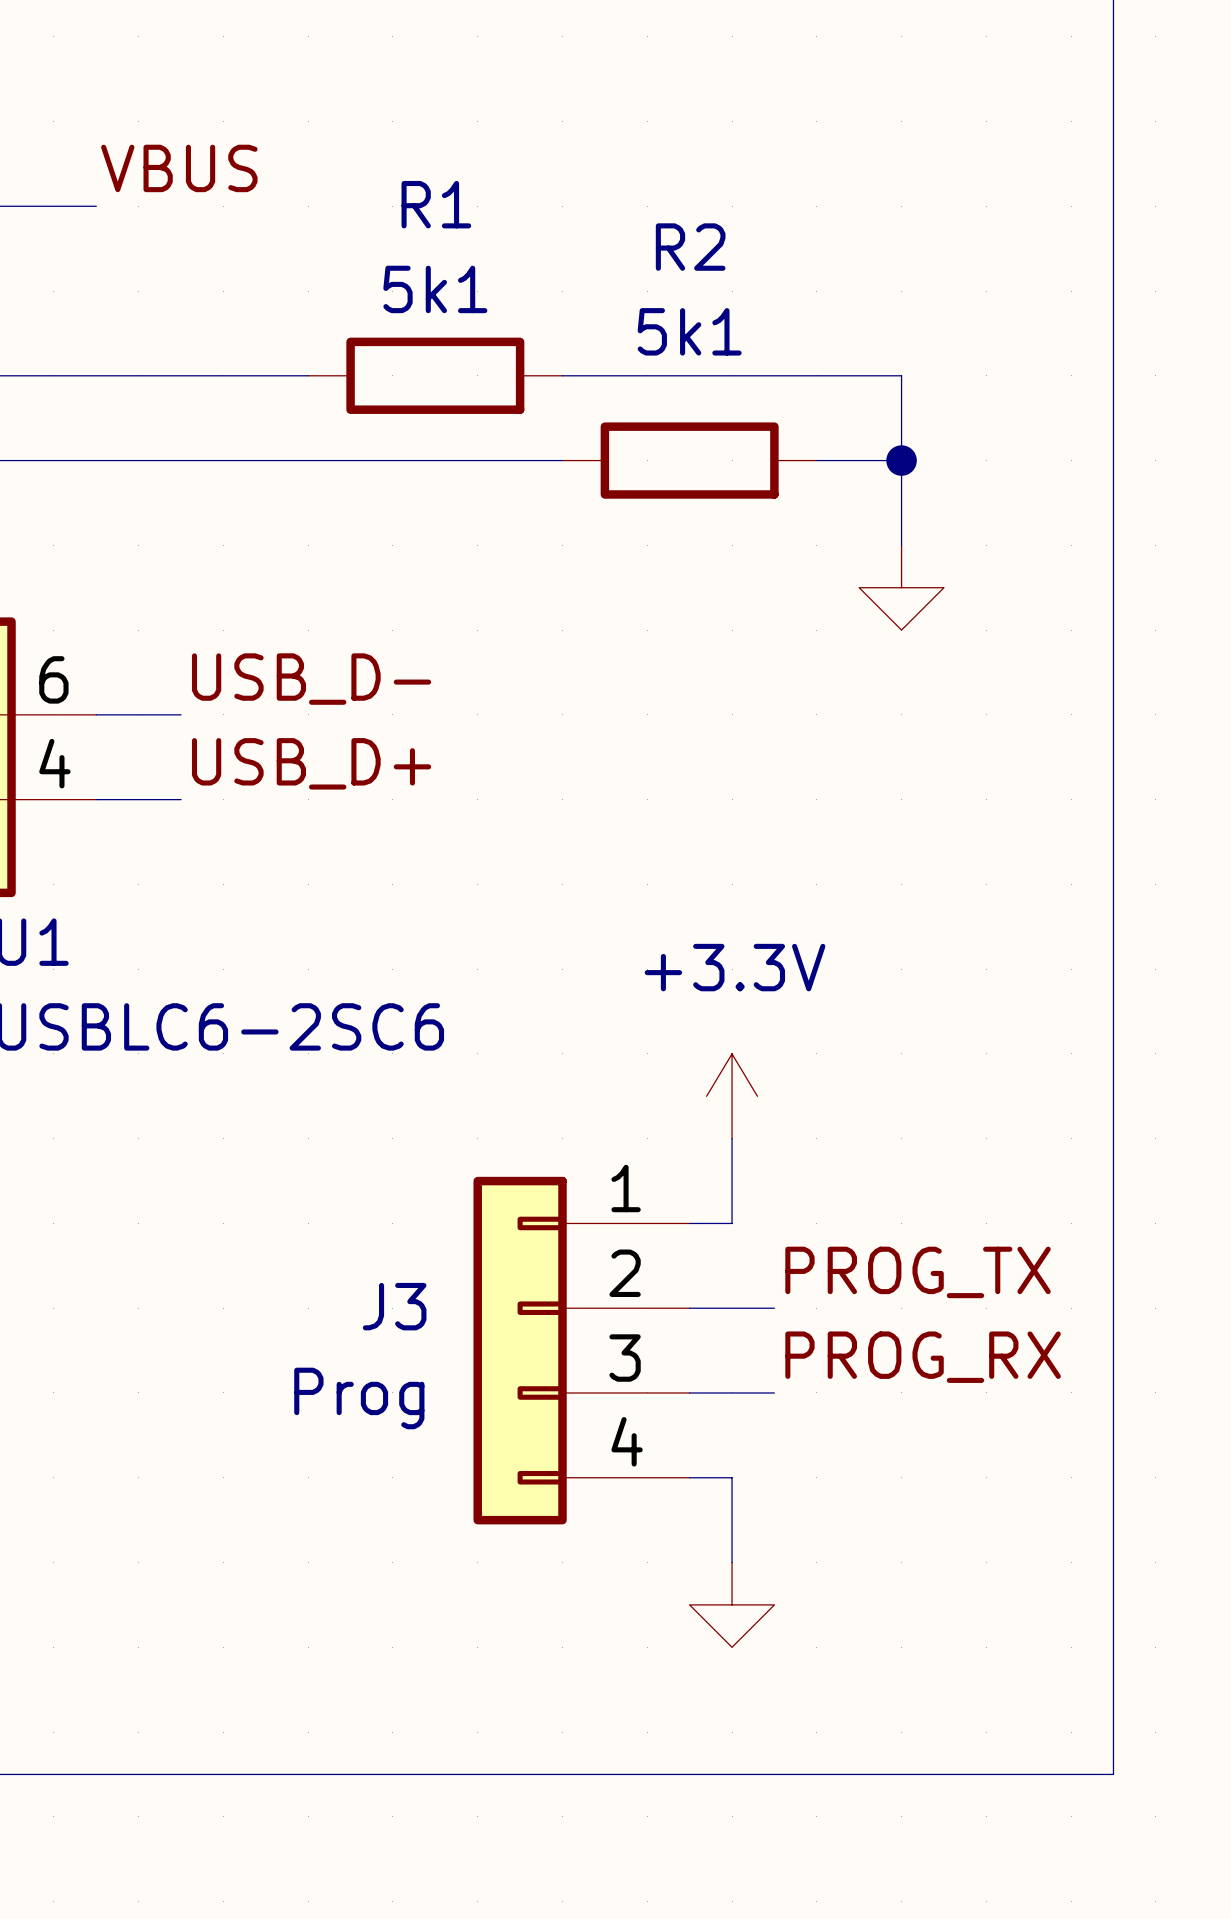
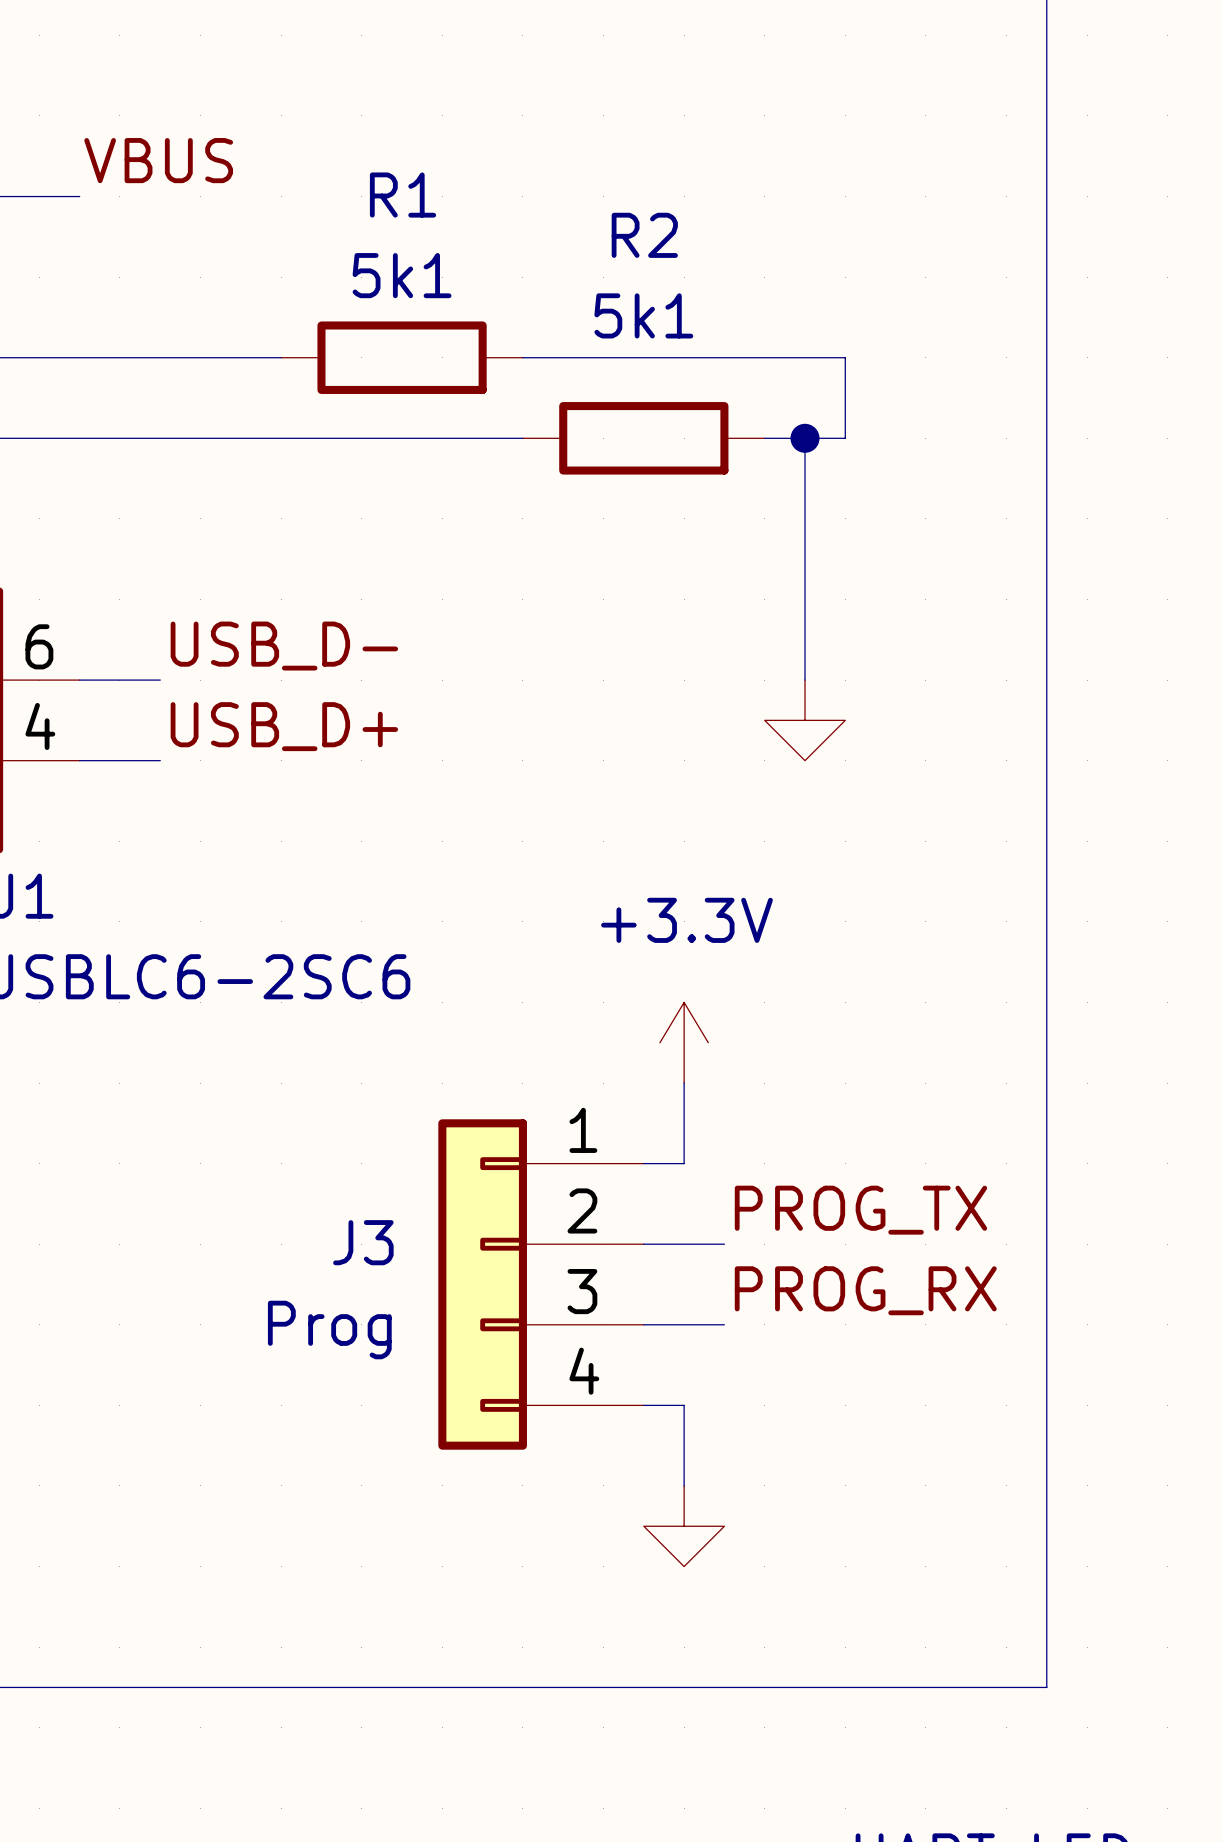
wire: none -> (805, 438) (805, 680)
wire: (901, 460) (901, 545) -> none
junction position: (901, 460) -> (805, 438)
power symbol position: (901, 587) -> (805, 720)

